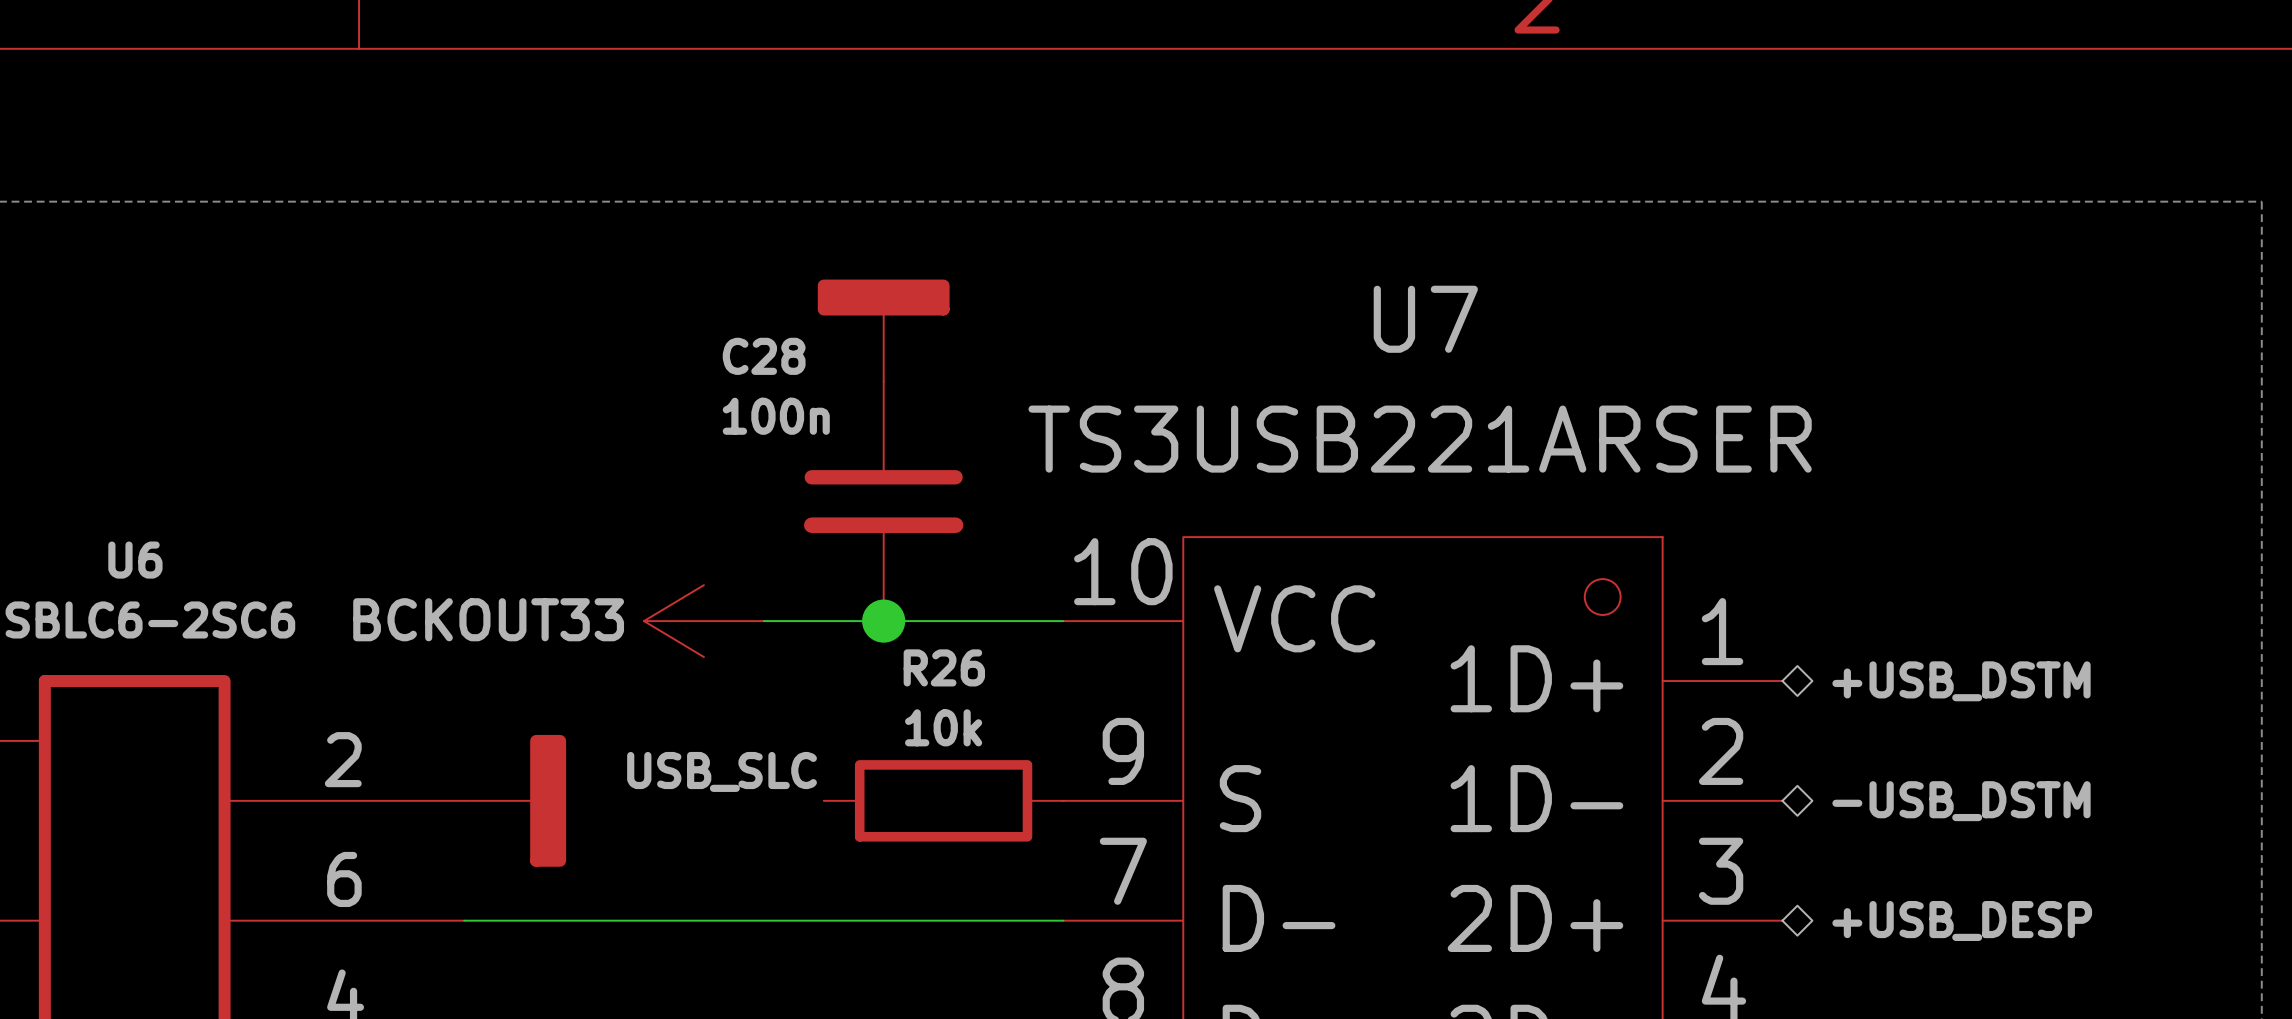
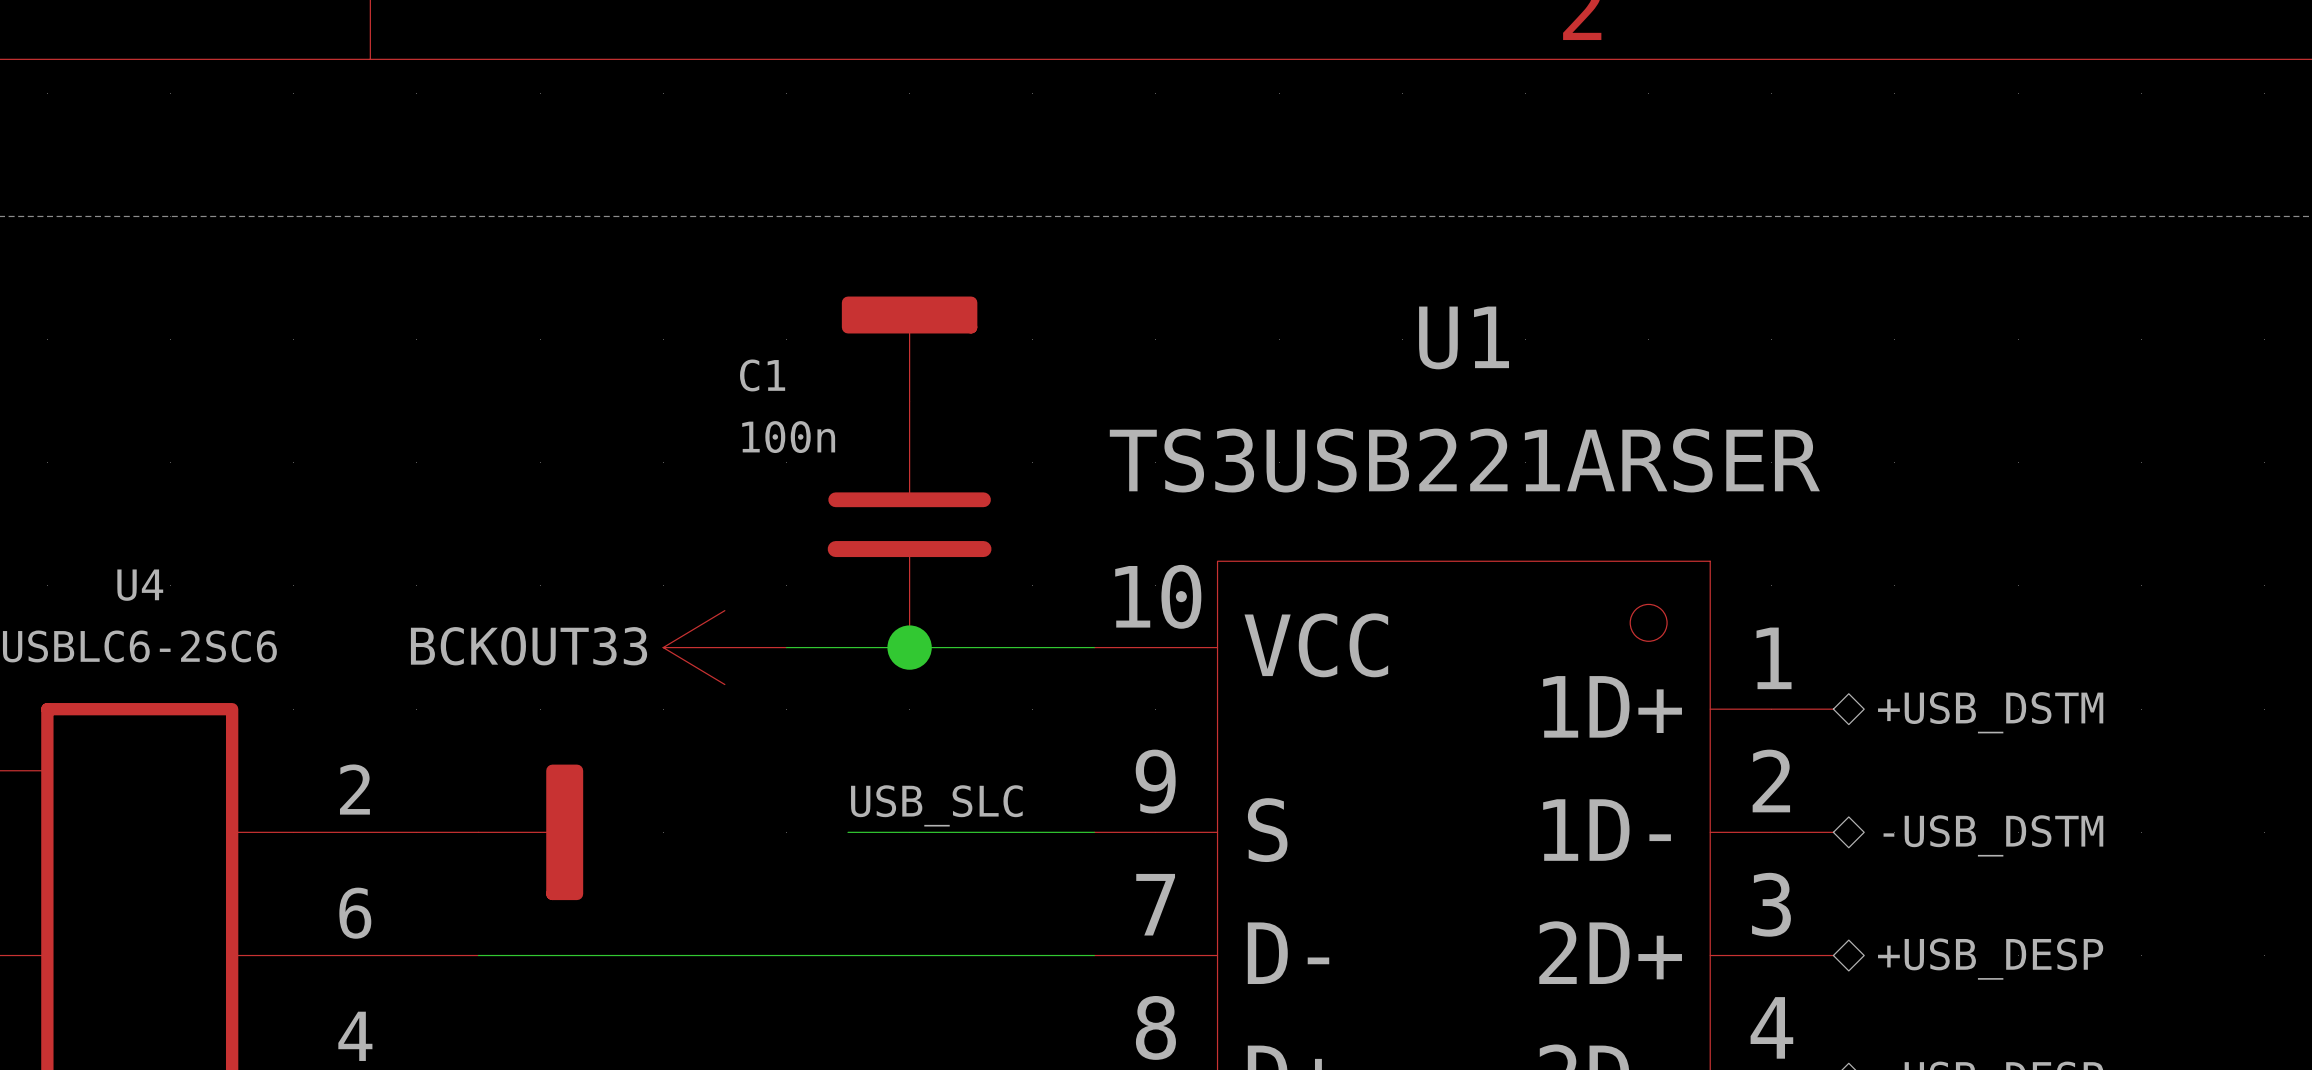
U7 name: U7 (1425, 319) -> U1 (1464, 337)
C28 name: C28 (764, 356) -> C1 (762, 375)
U6 name: U6 (135, 560) -> U4 (140, 585)
label position: USB_SLC (722, 771) -> USB_SLC (936, 805)
wire: none -> (848, 832) (1094, 832)
R26: 10k (943, 800) -> none

